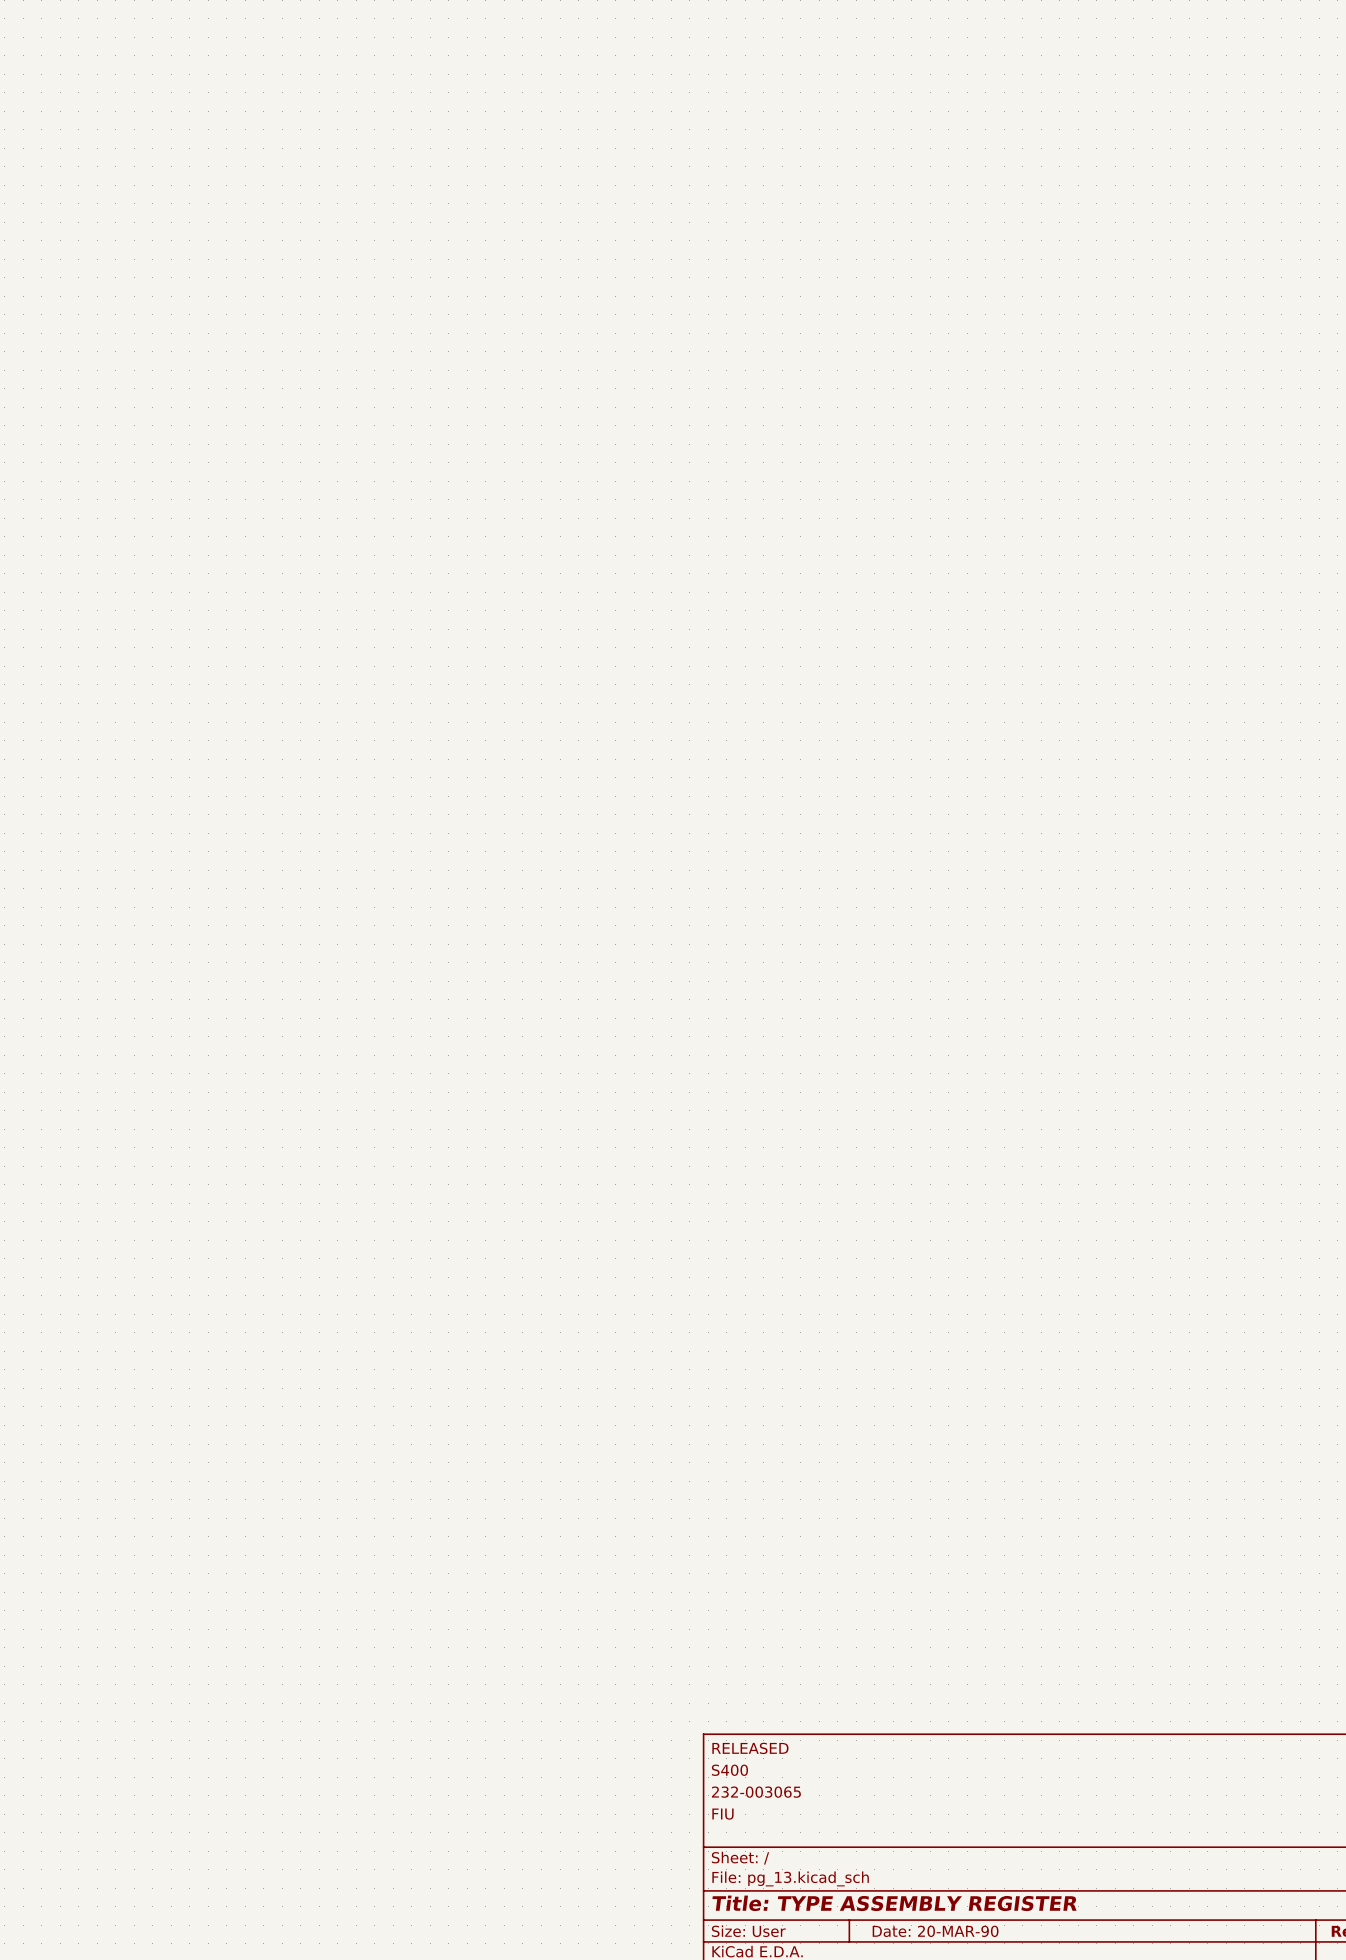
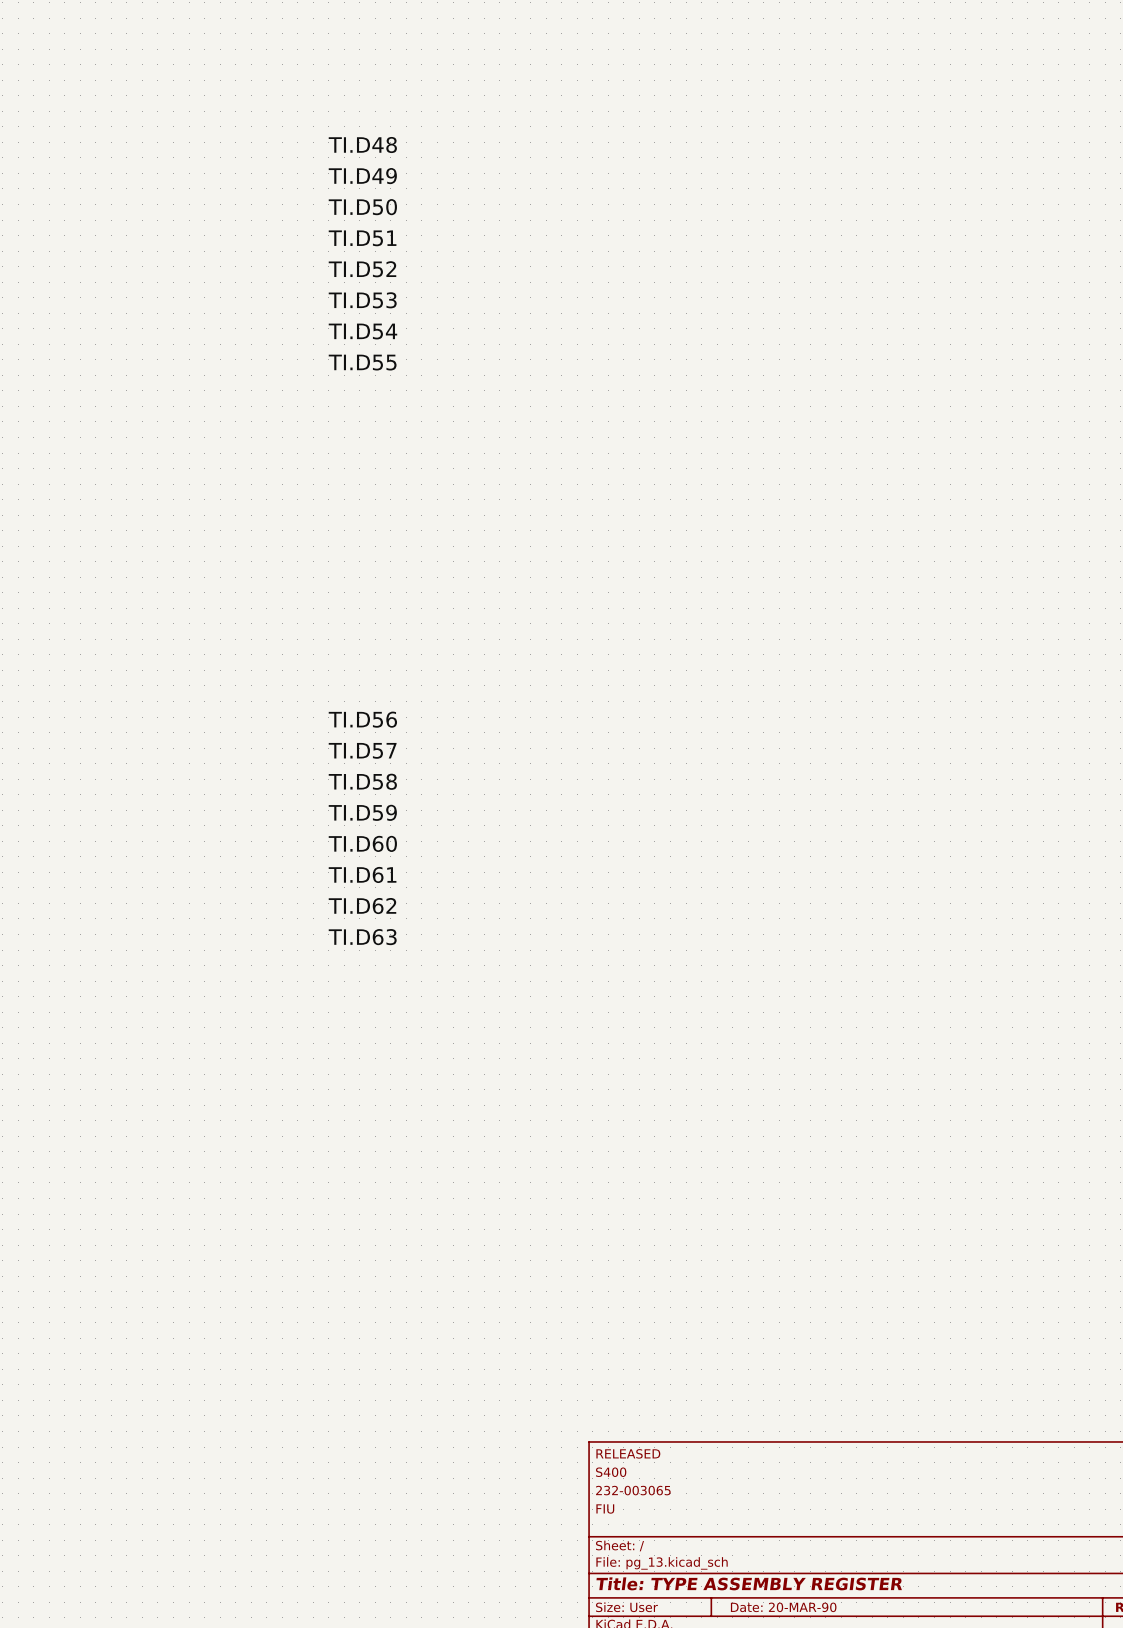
label: none -> TI.D48 (362, 145)
label: none -> TI.D49 (362, 176)
label: none -> TI.D50 (362, 207)
label: none -> TI.D51 (362, 238)
label: none -> TI.D52 (362, 269)
label: none -> TI.D53 (362, 300)
label: none -> TI.D54 (362, 331)
label: none -> TI.D55 (362, 362)
label: none -> TI.D56 (362, 719)
label: none -> TI.D57 (362, 750)
label: none -> TI.D58 (362, 781)
label: none -> TI.D59 (362, 812)
label: none -> TI.D60 (362, 843)
label: none -> TI.D61 (362, 874)
label: none -> TI.D62 (362, 906)
label: none -> TI.D63 (362, 937)

